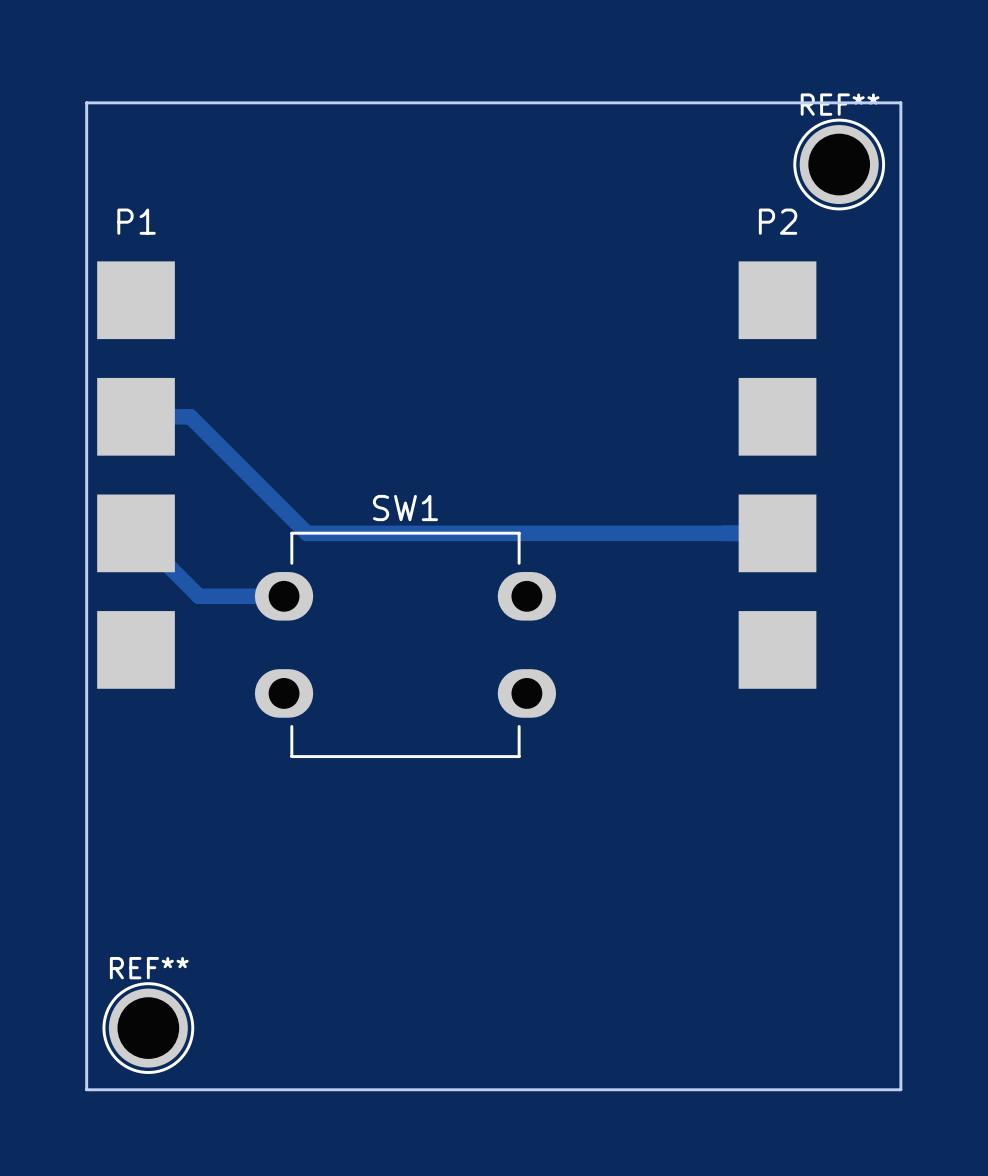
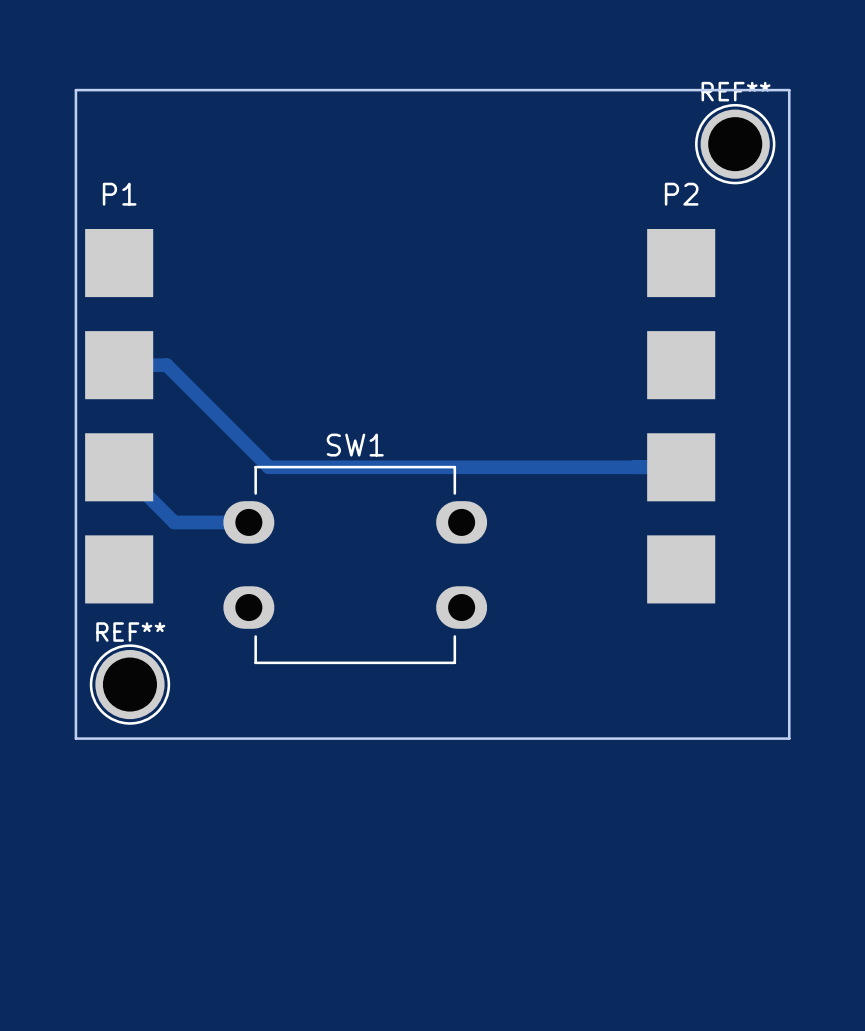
board edge: (86, 843) (86, 1089) (900, 1089) (900, 843) -> (75, 738) (789, 738)
REF** position: (148, 1028) -> (129, 684)

